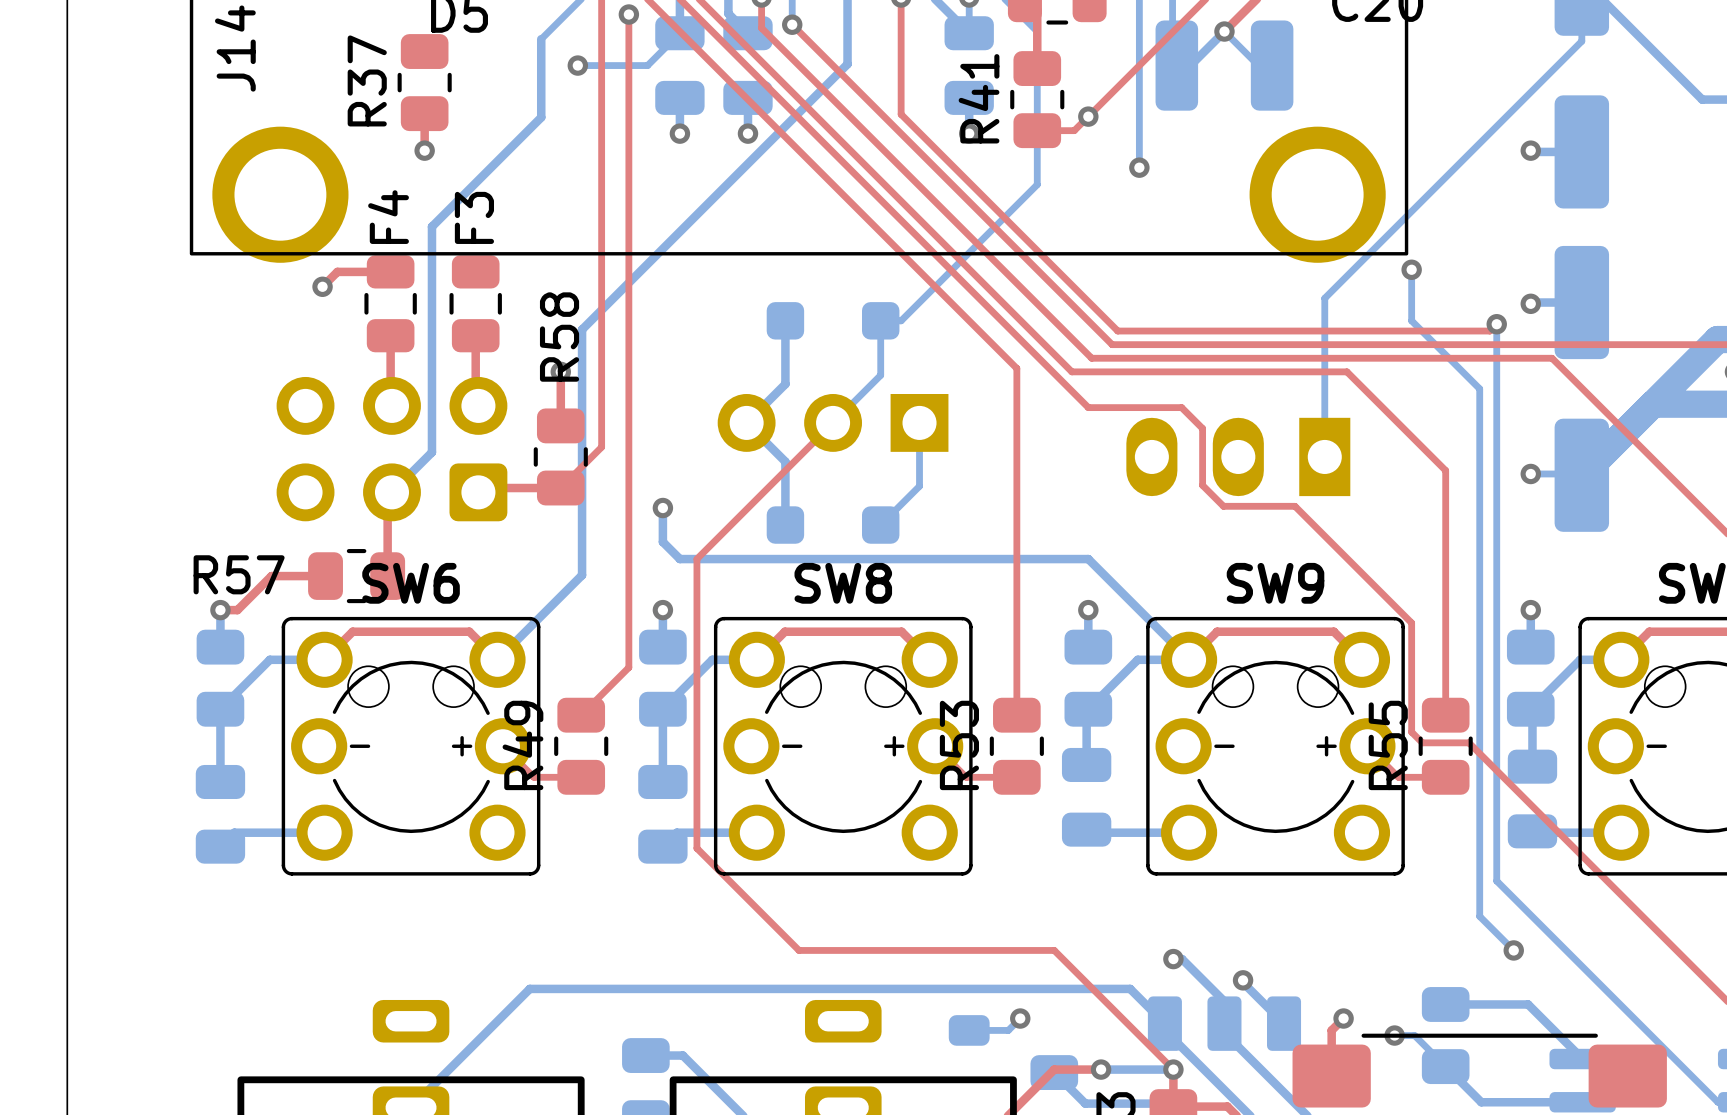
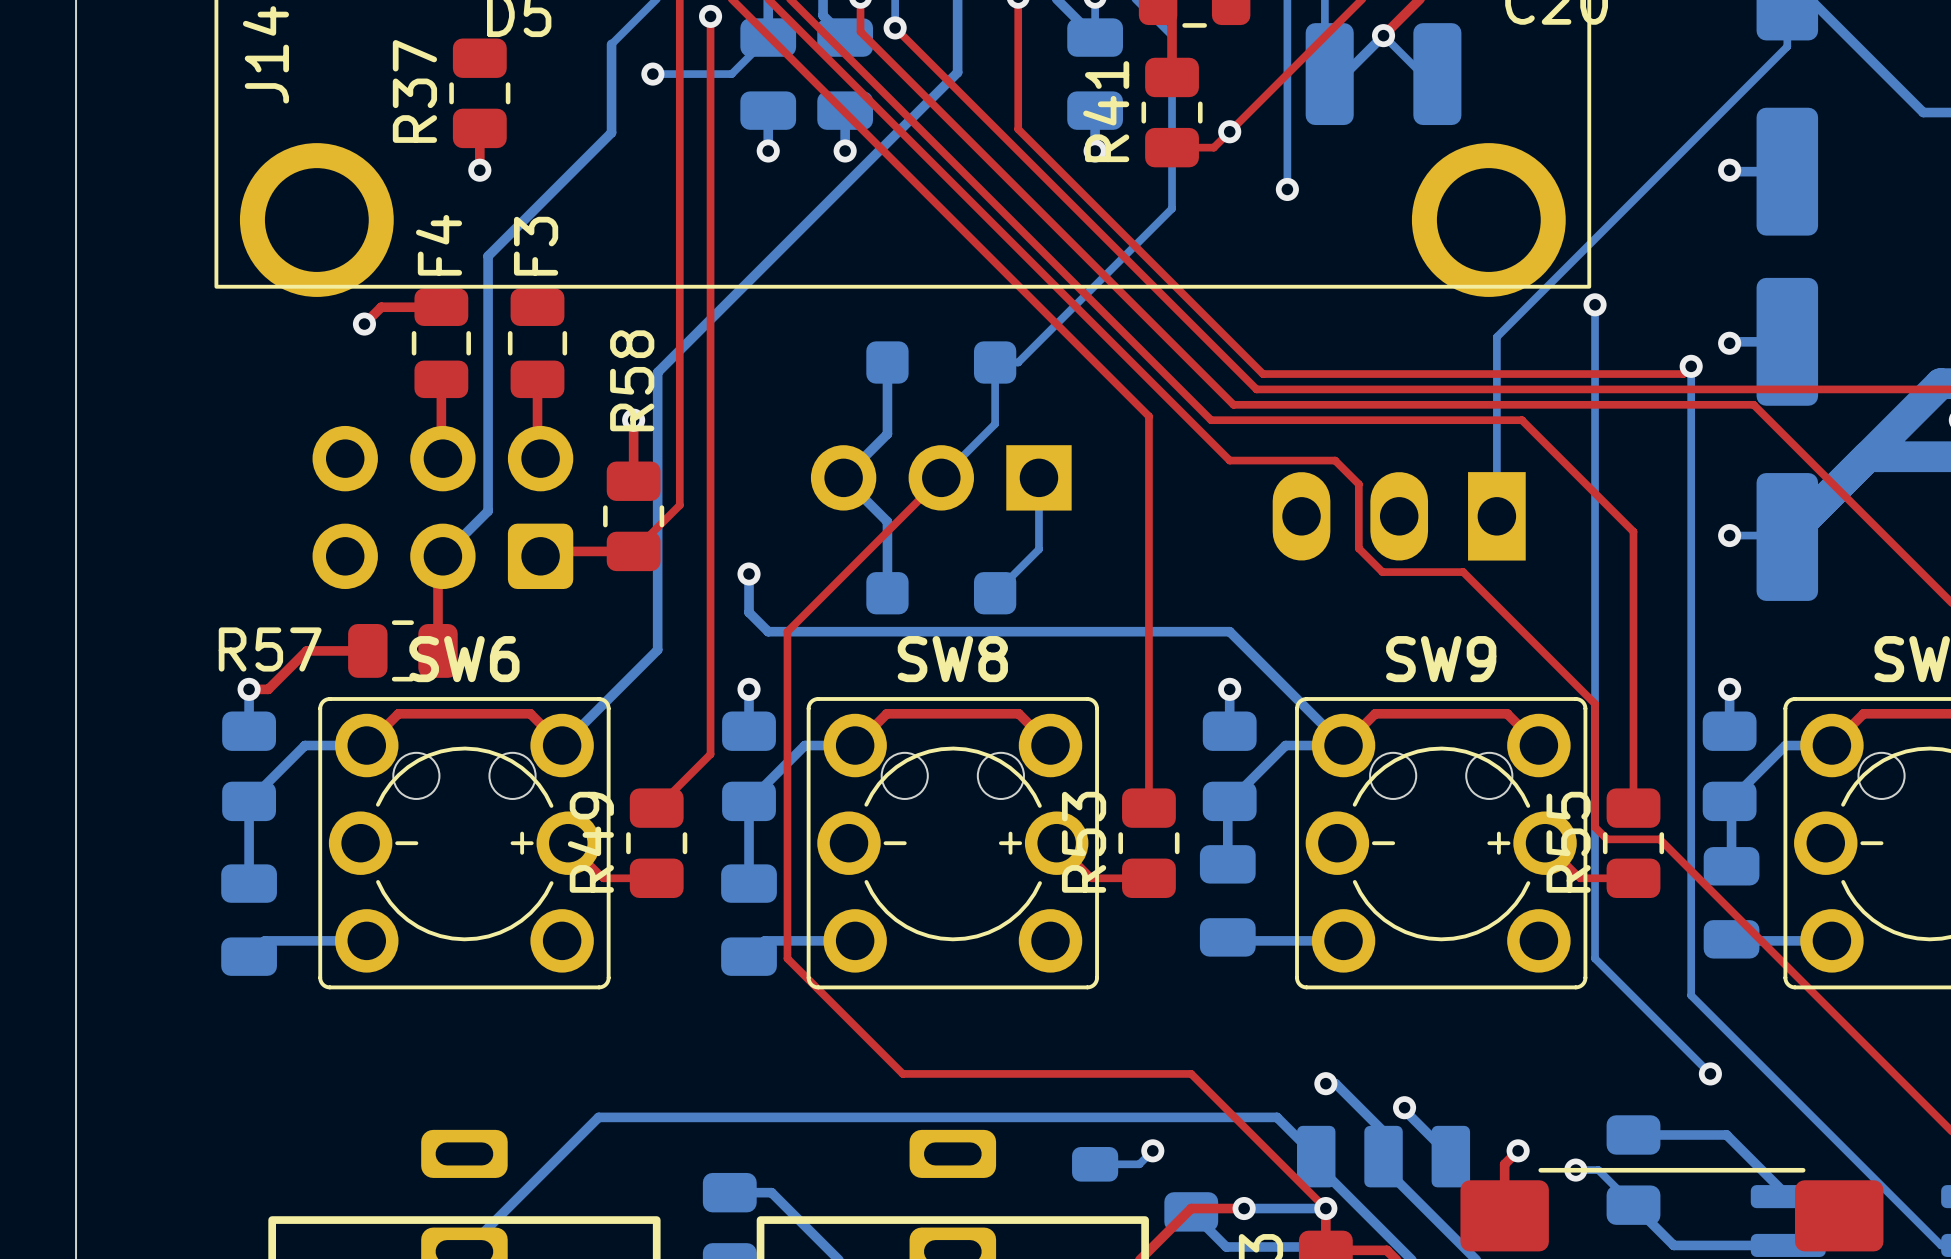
bottom track: (1411, 320) (1479, 388) (1479, 916) -> (1595, 362) (1595, 958) (1671, 1035)

